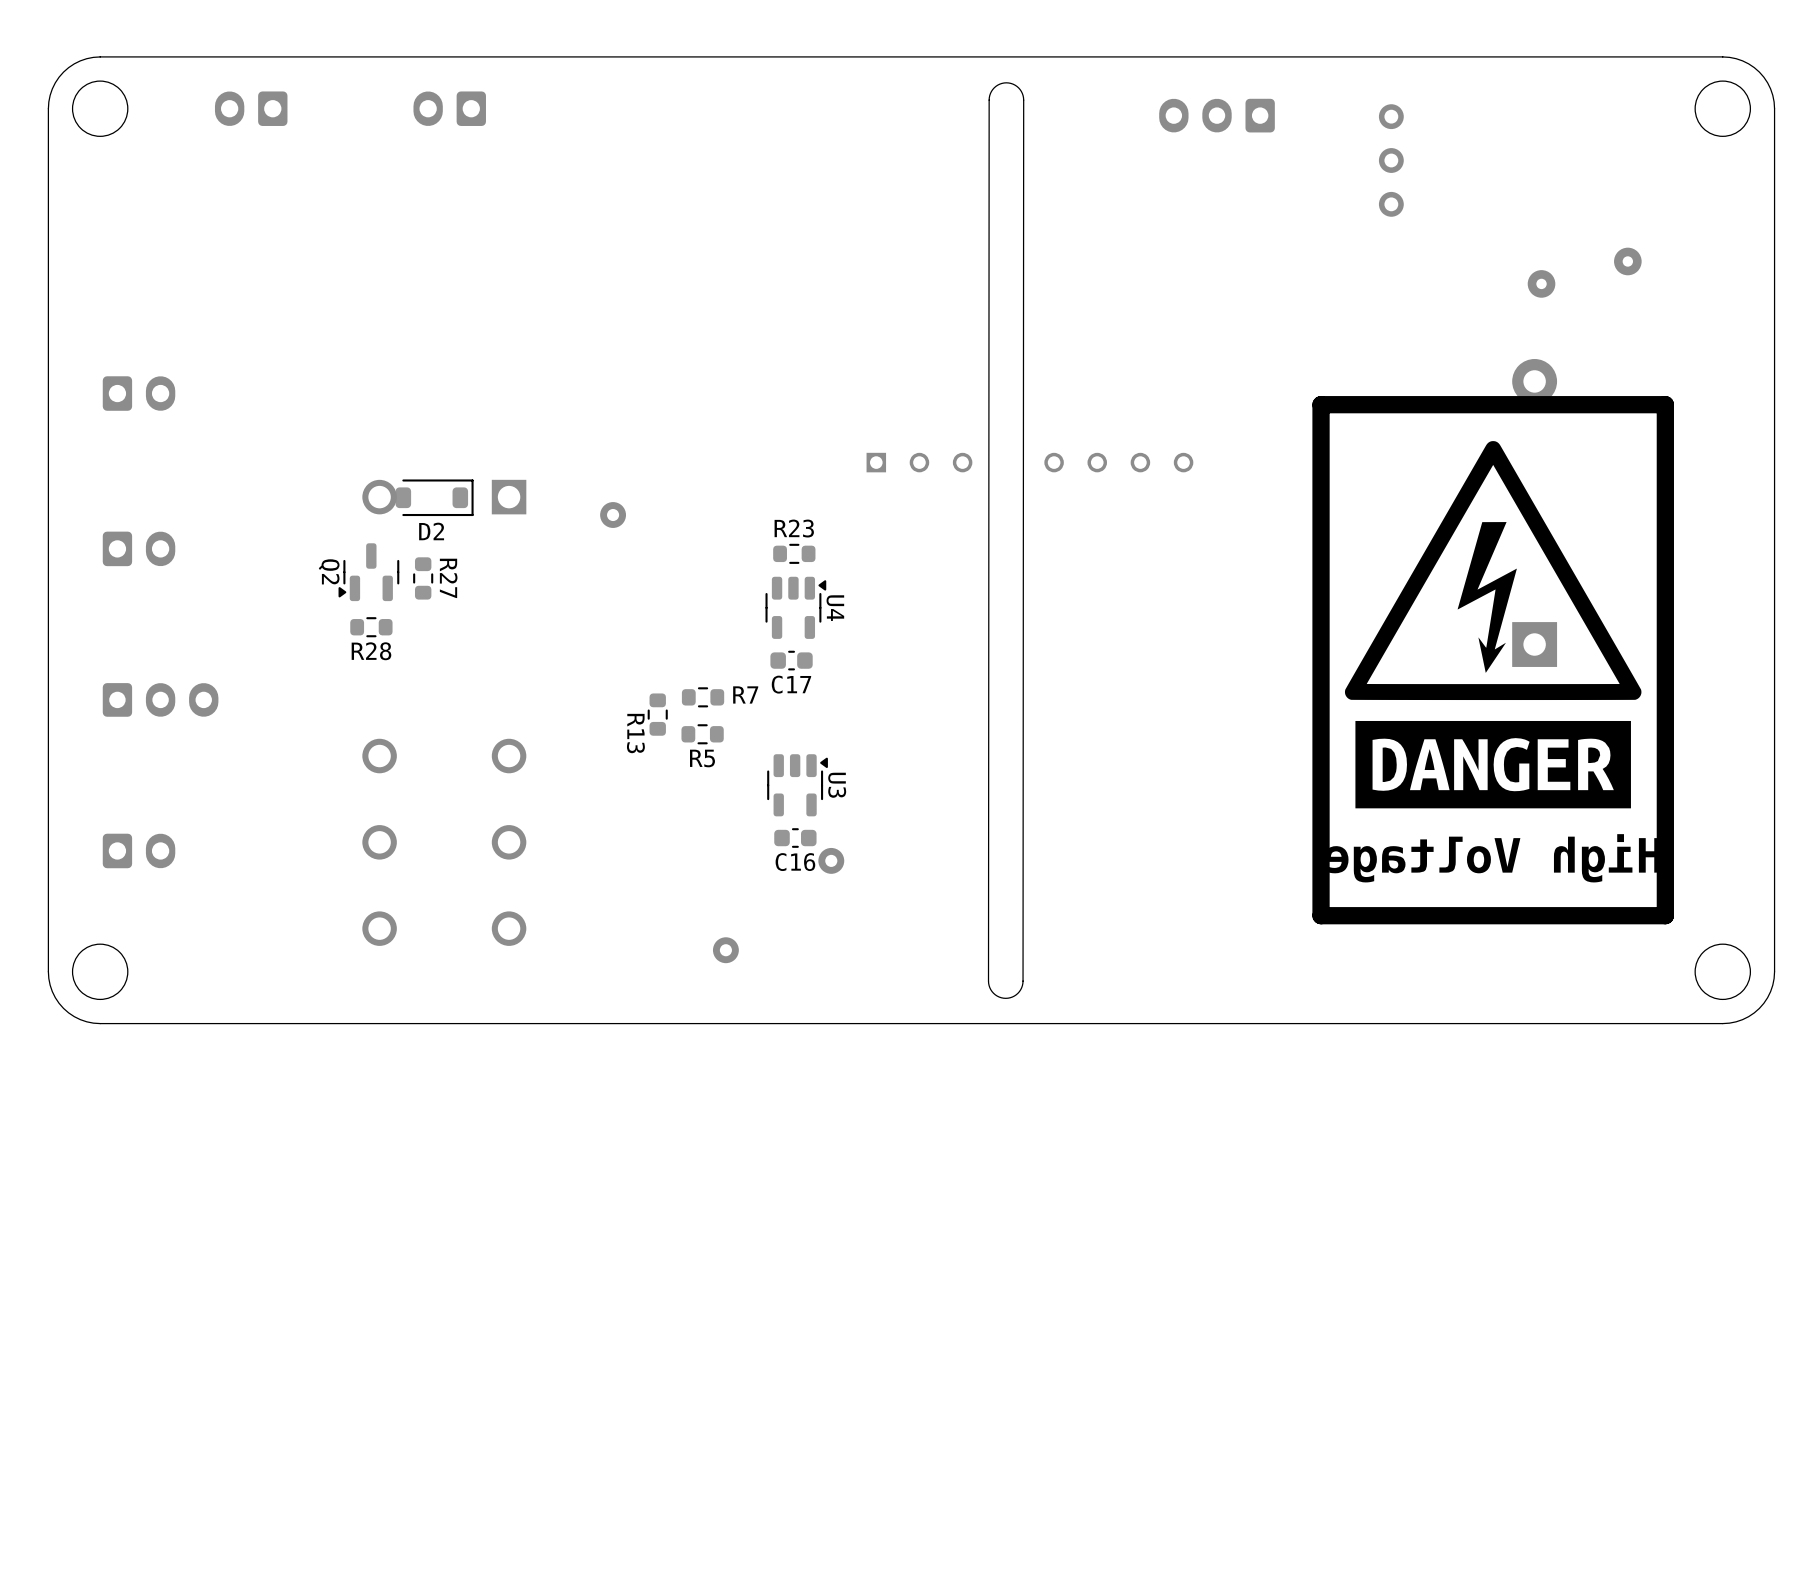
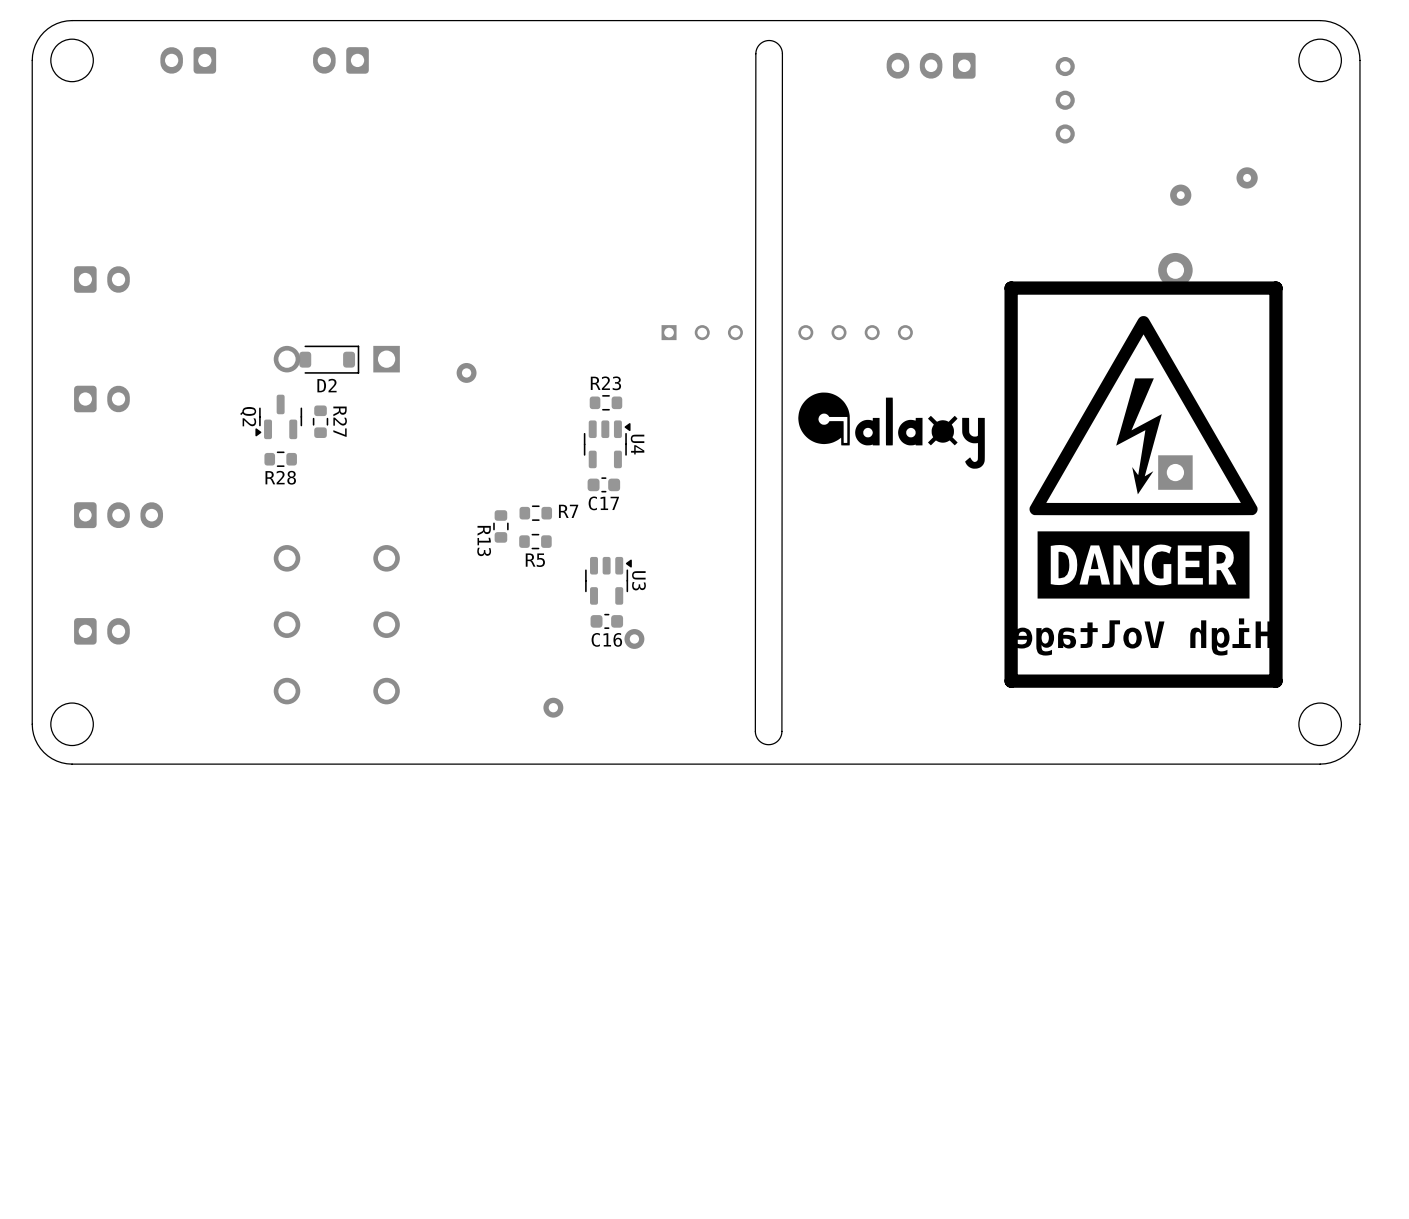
drawing: none -> [798, 392, 985, 469]

